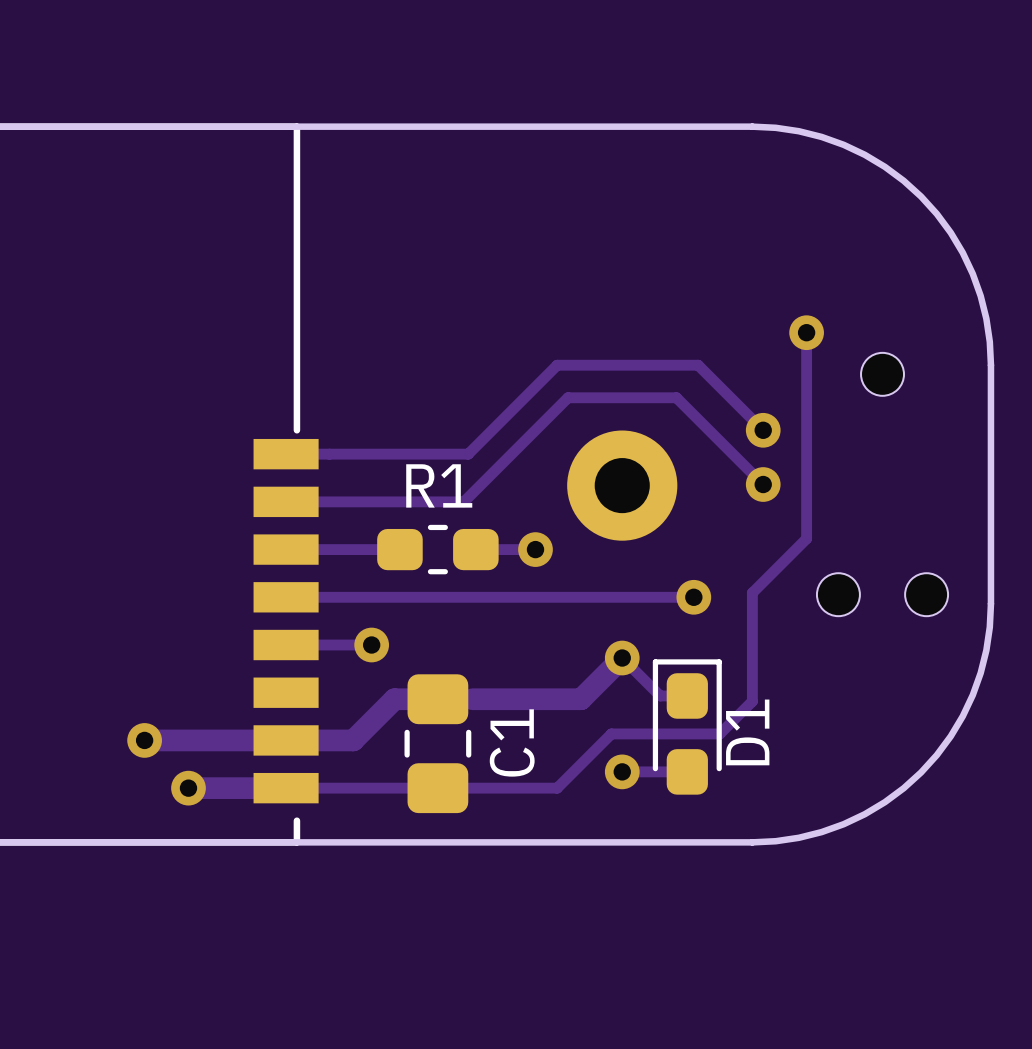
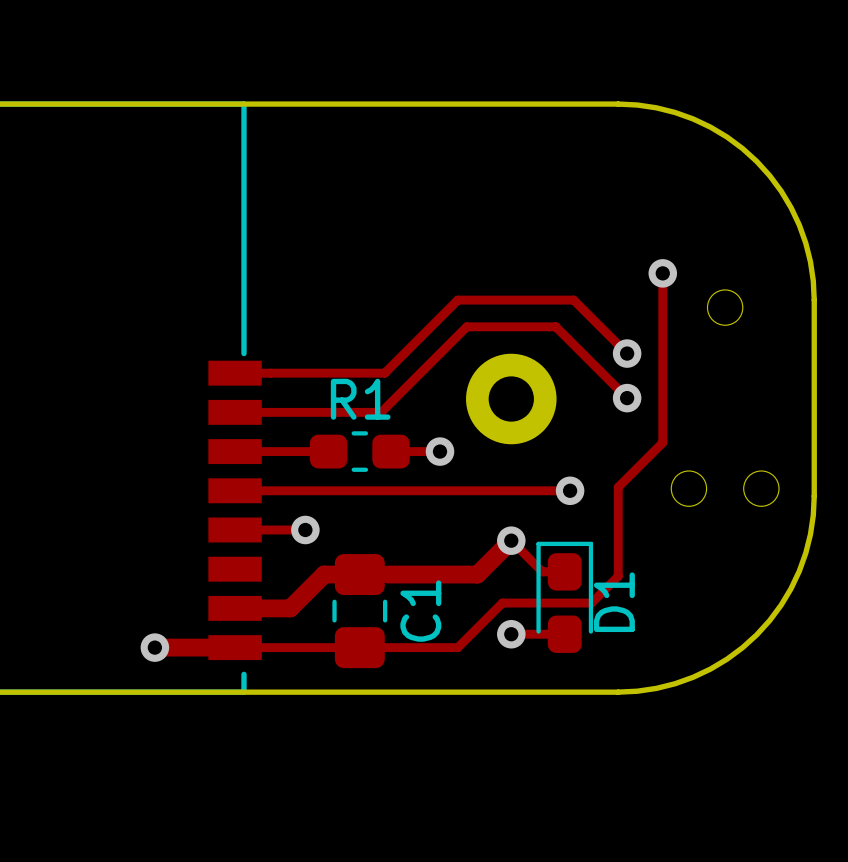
track: (144, 740) (286, 740) -> none
via: (144, 740) -> none

